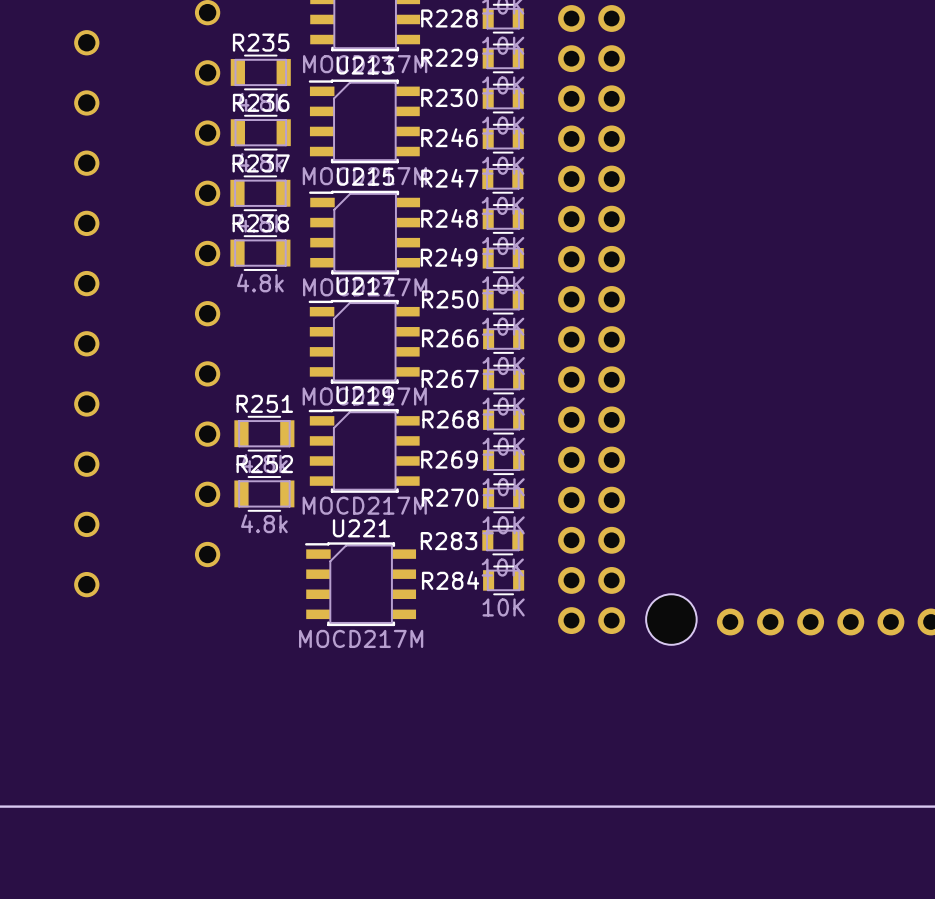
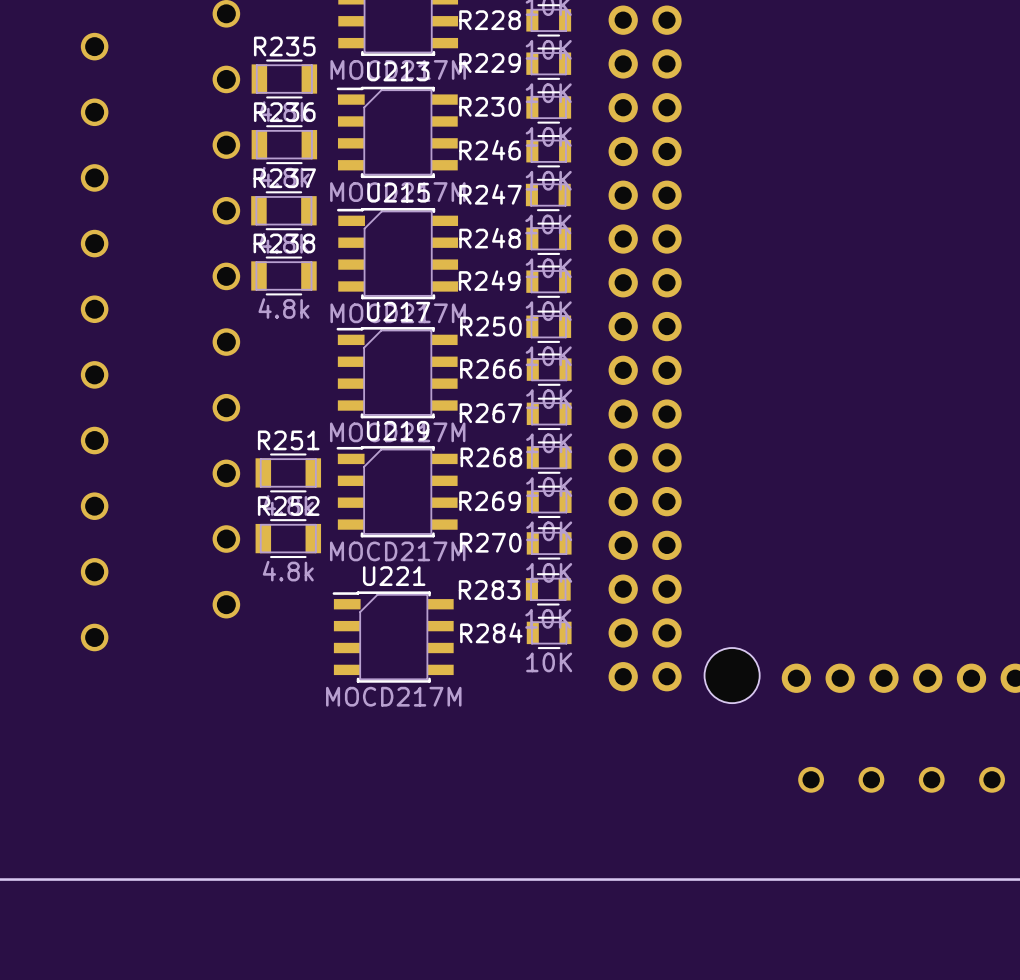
part: none -> (841, 779)
part: none -> (961, 779)

